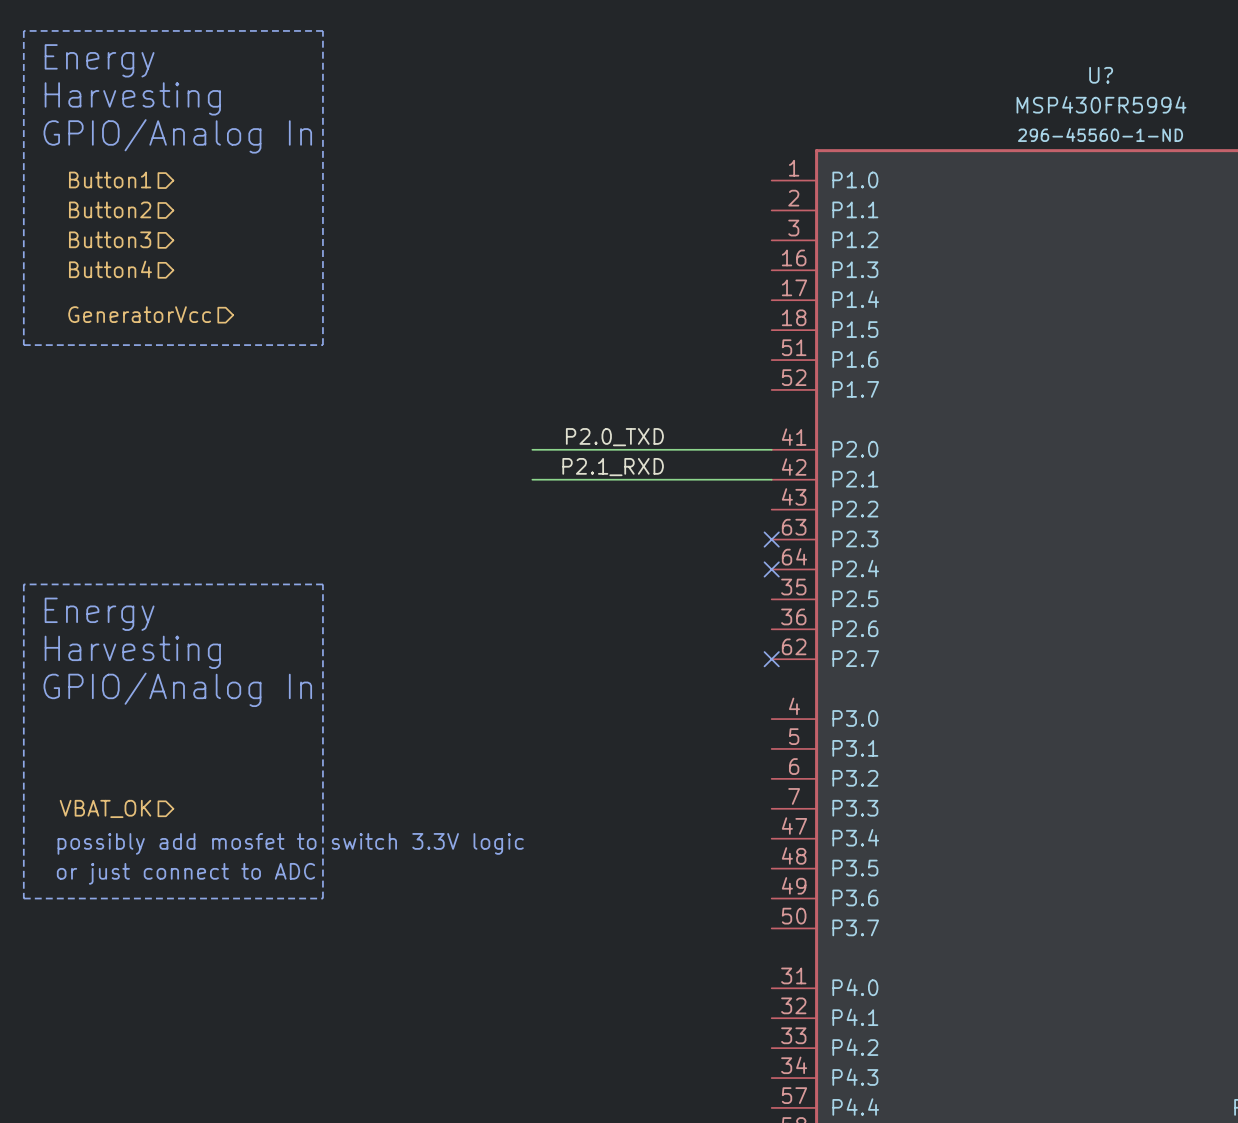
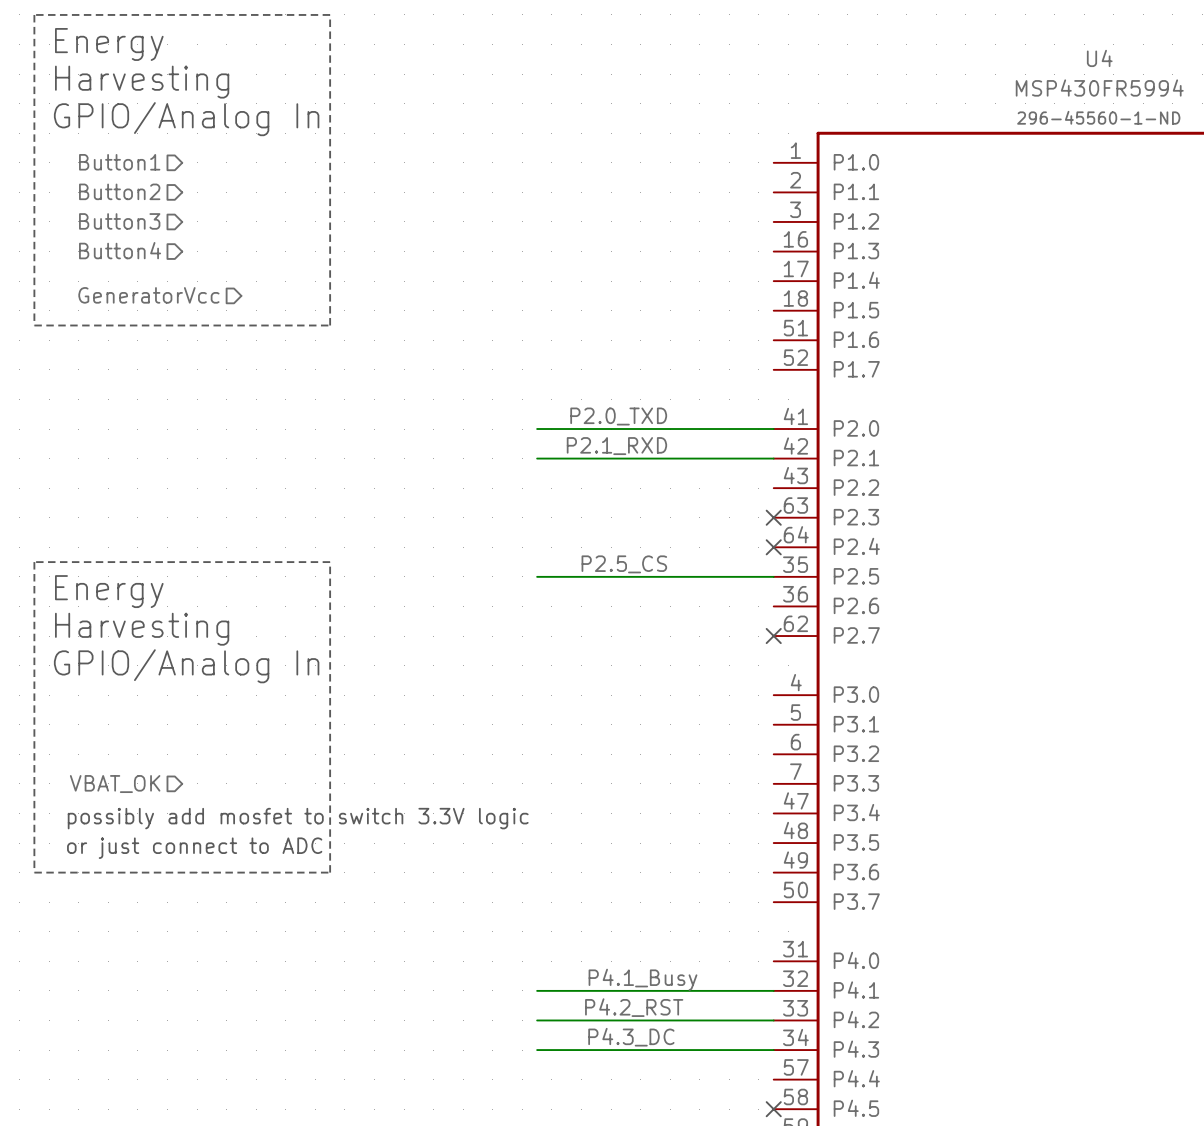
U? name: U? (1101, 75) -> U4 (1099, 58)
label: none -> P2.5_CS (624, 564)
wire: none -> (537, 576) (773, 576)
label: none -> P4.1_Busy (642, 979)
wire: none -> (537, 990) (773, 990)
label: none -> P4.2_RST (634, 1007)
wire: none -> (537, 1020) (773, 1020)
label: none -> P4.3_DC (631, 1037)
wire: none -> (537, 1050) (773, 1050)

